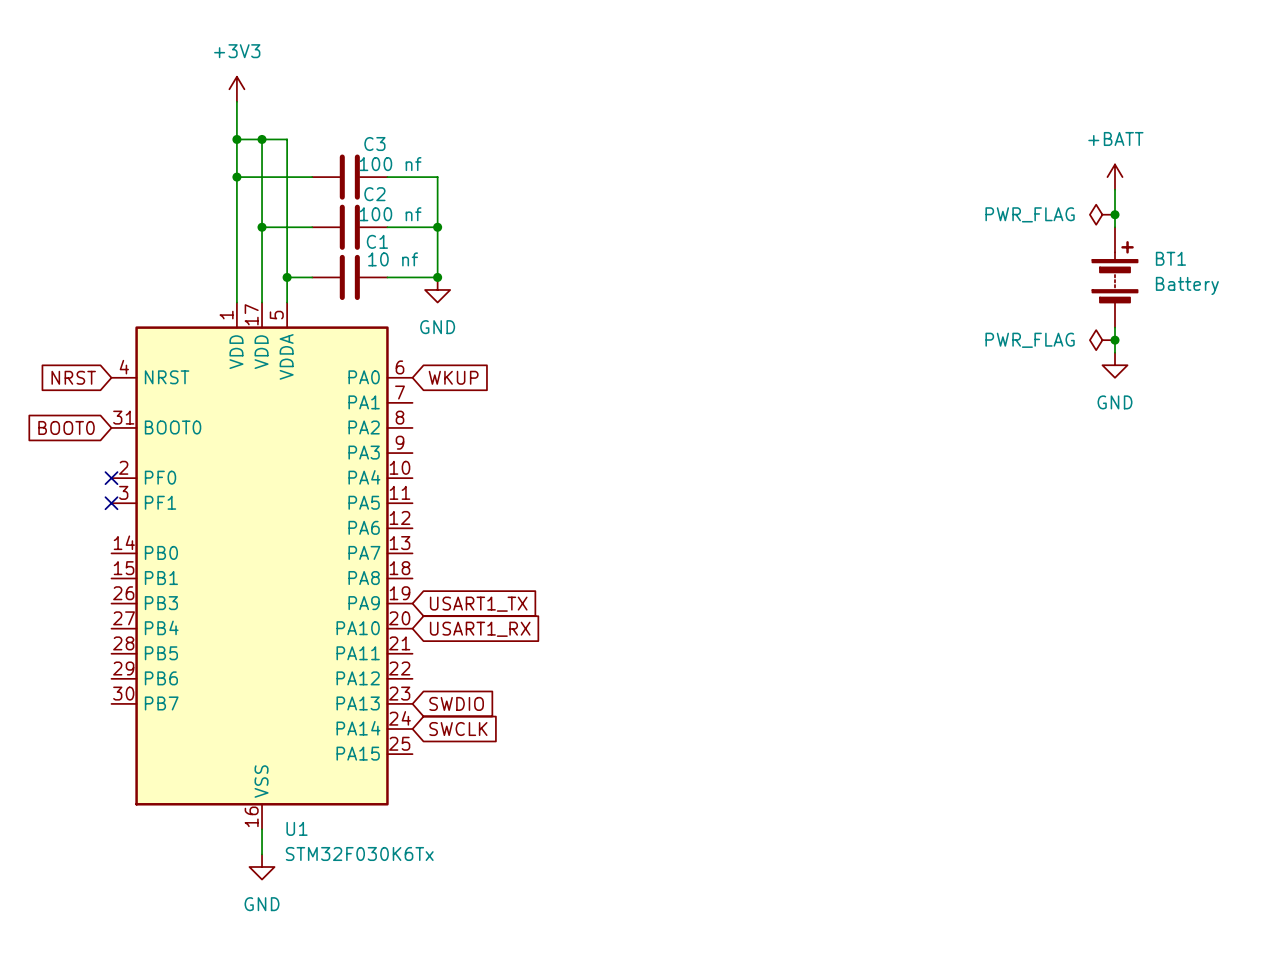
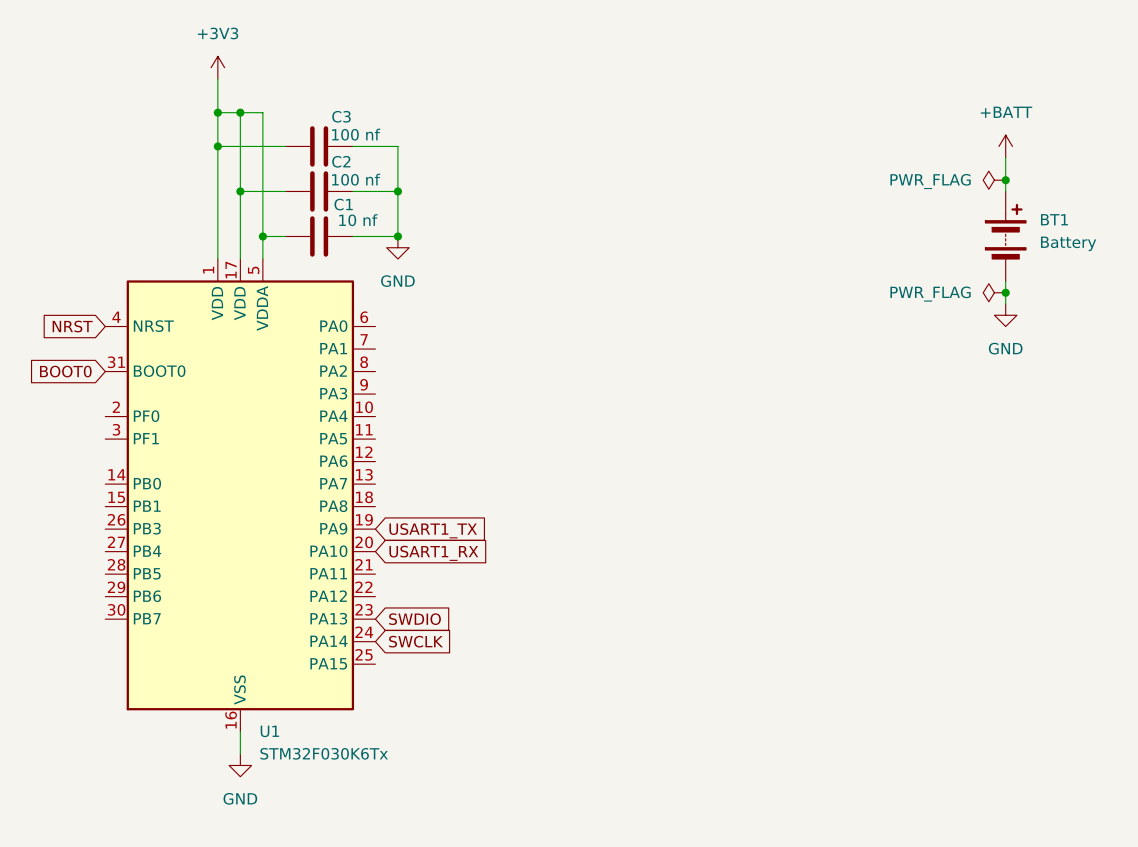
global label: WKUP (453, 377) -> none
no-connect mark: (111, 478) -> none
no-connect mark: (111, 503) -> none

